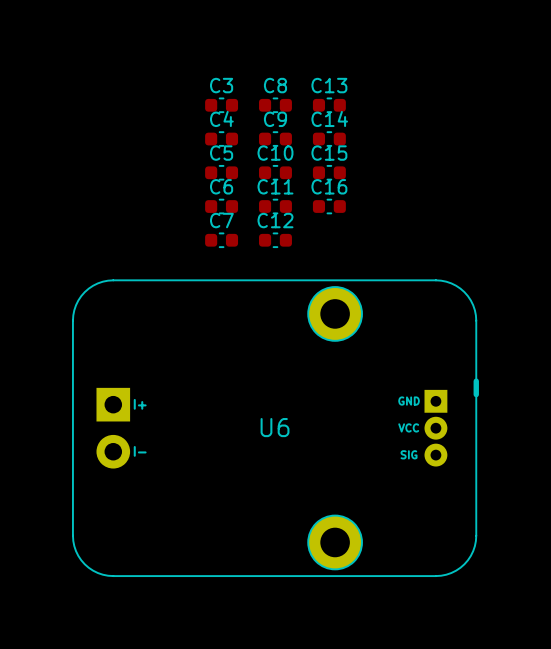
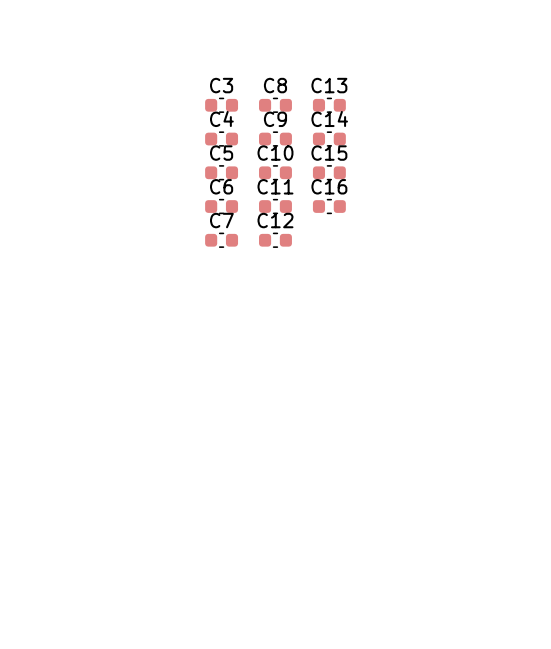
U6: (275, 428) -> none

